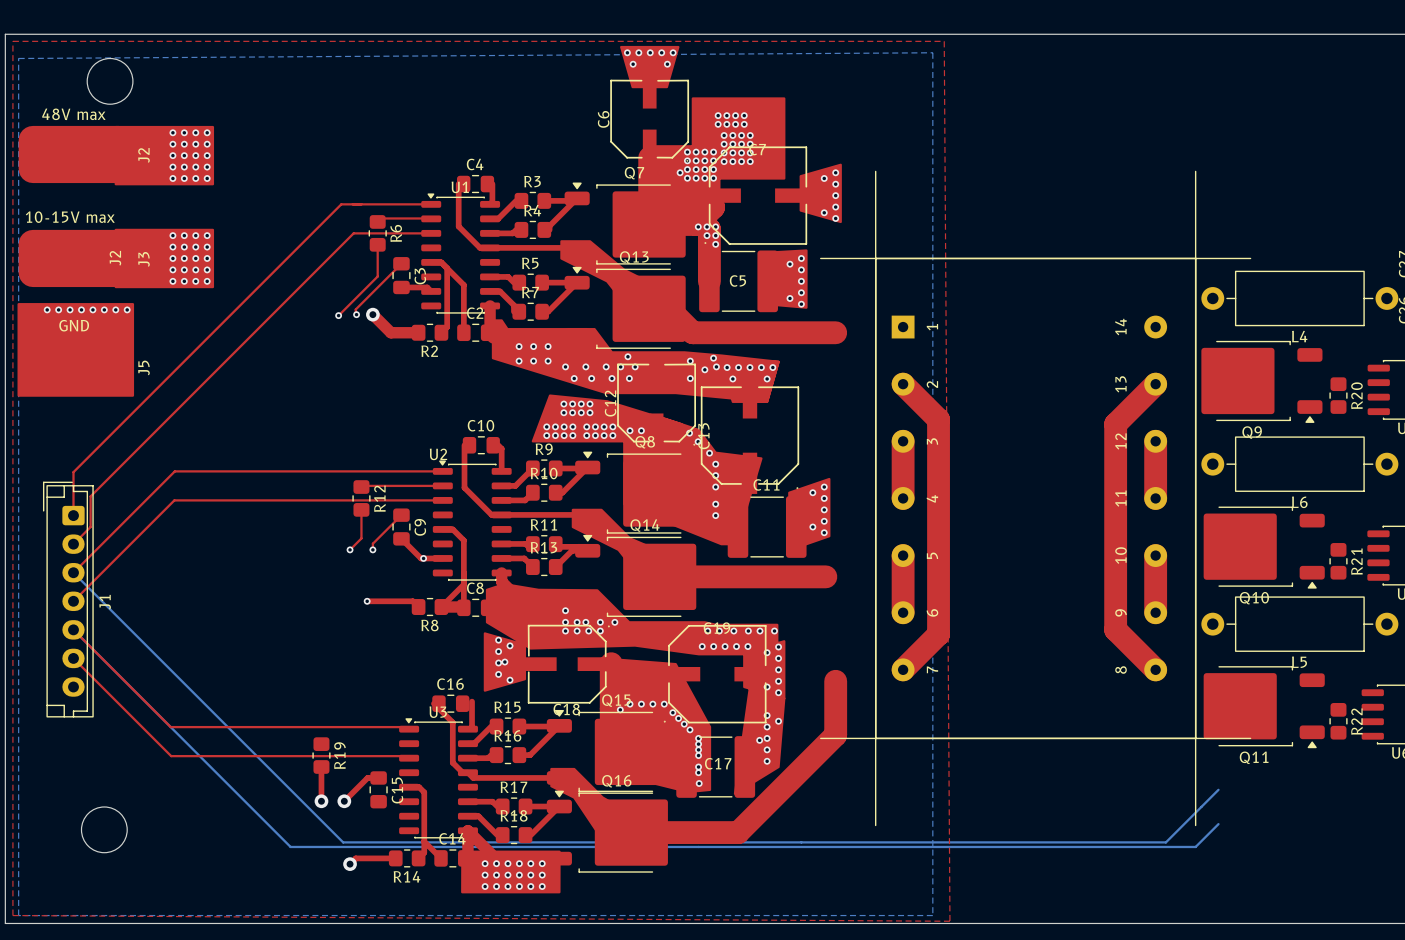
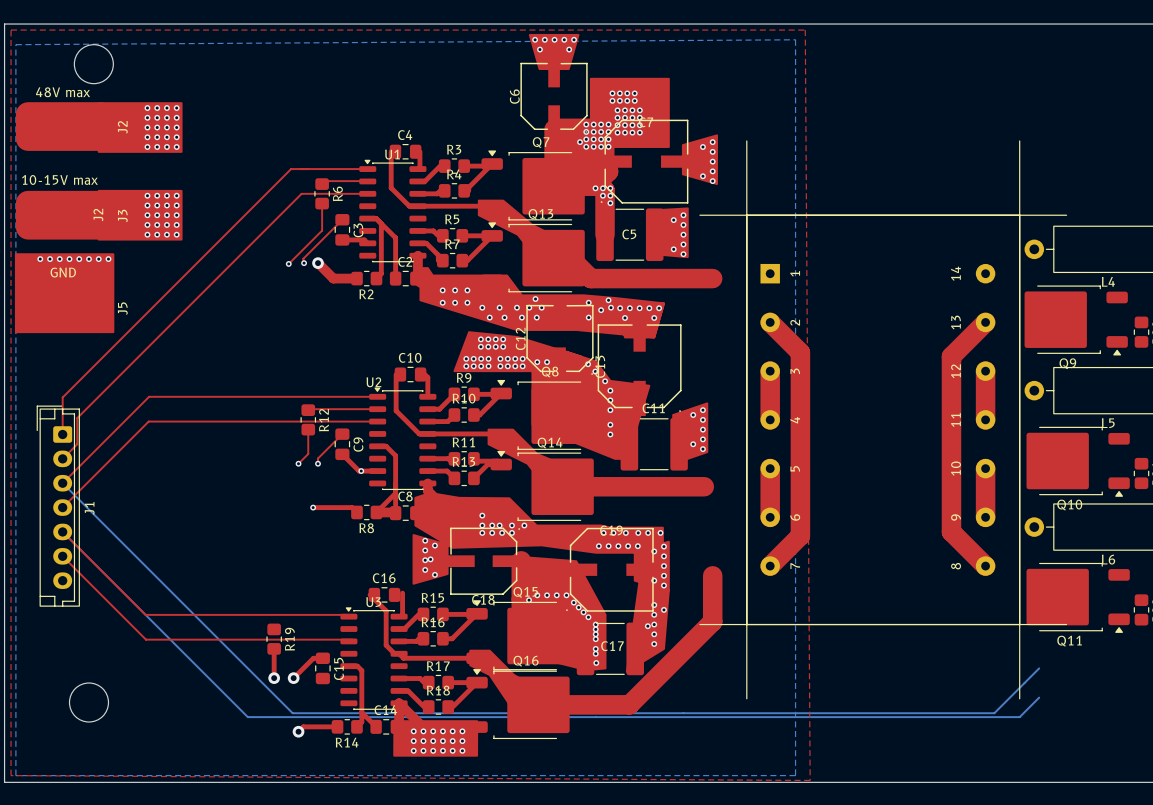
L6 name: L6 (1299, 502) -> L5 (1108, 423)
L5 name: L5 (1299, 662) -> L6 (1108, 559)

